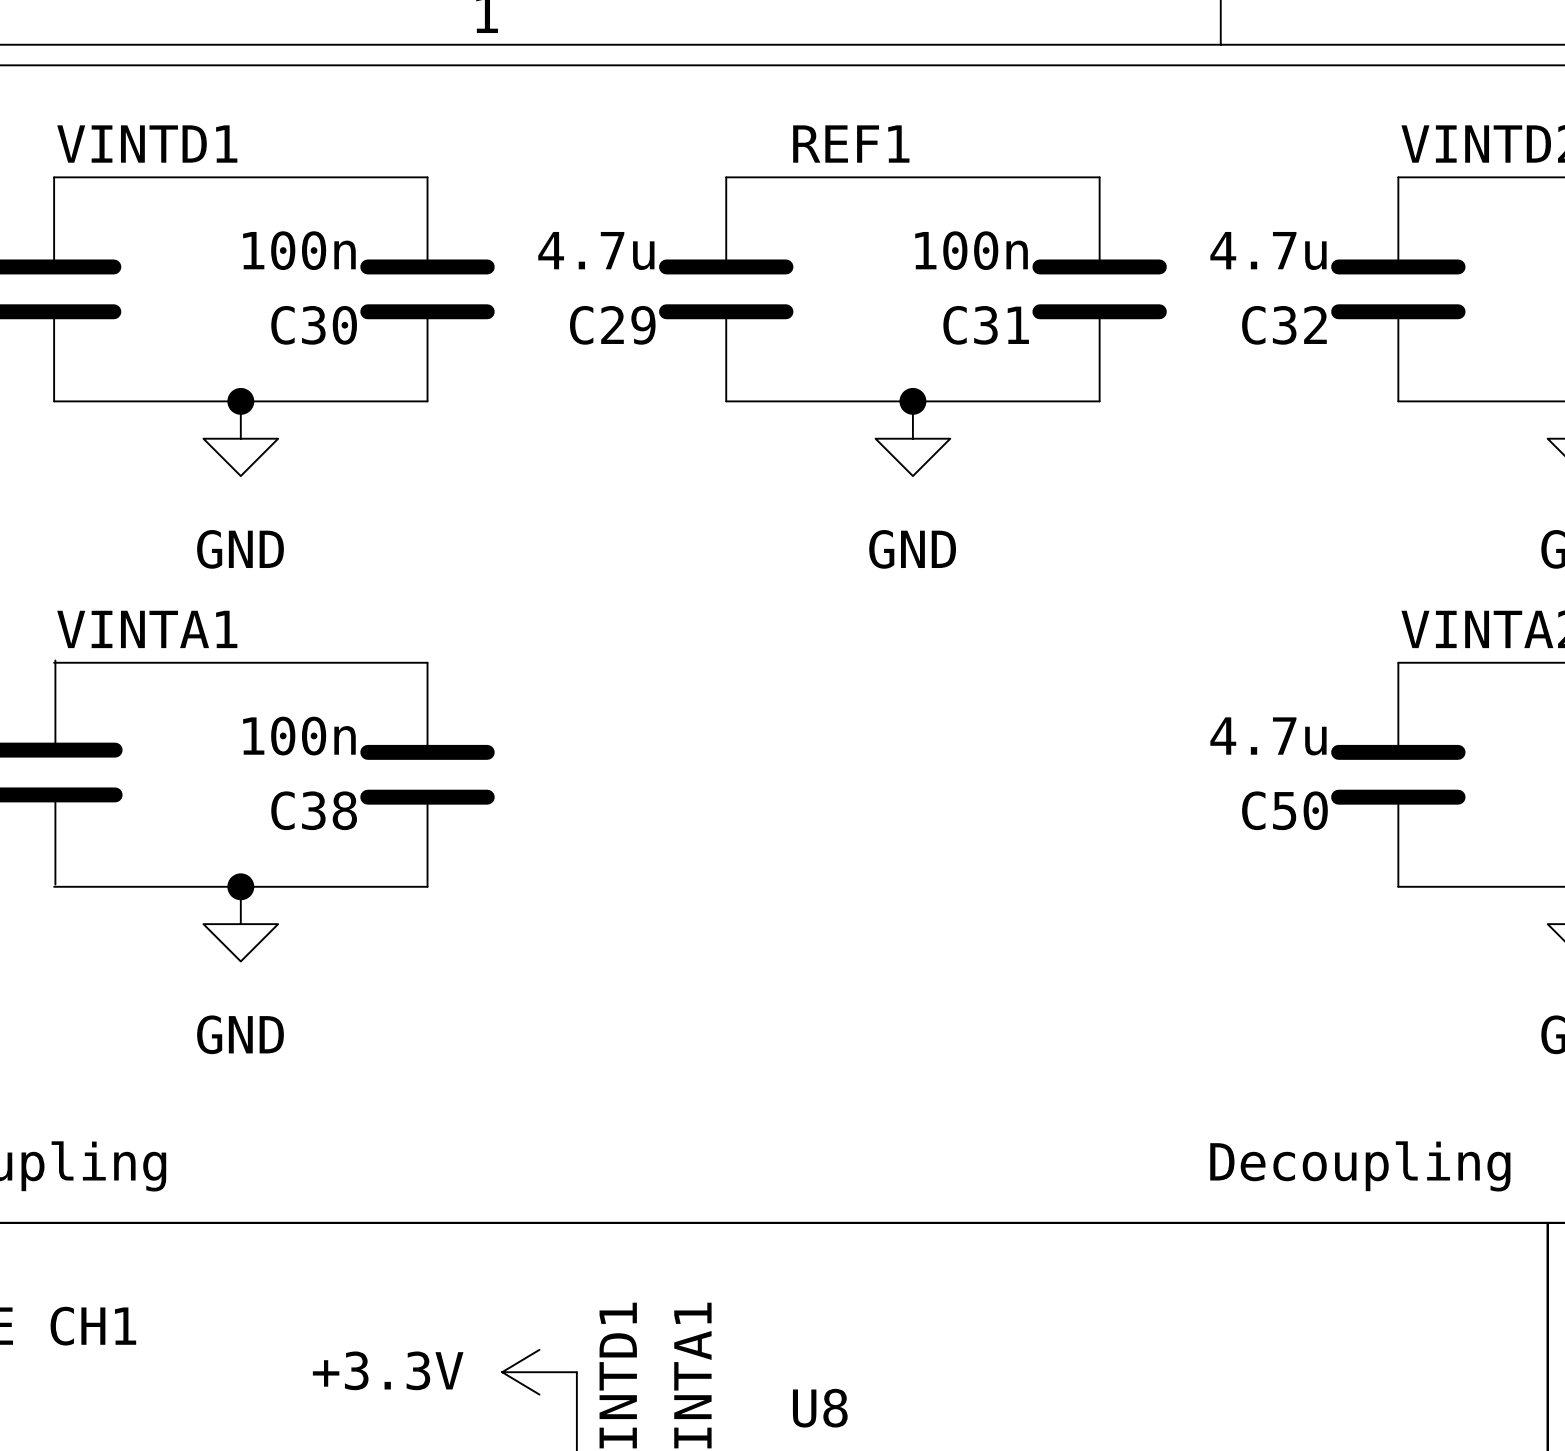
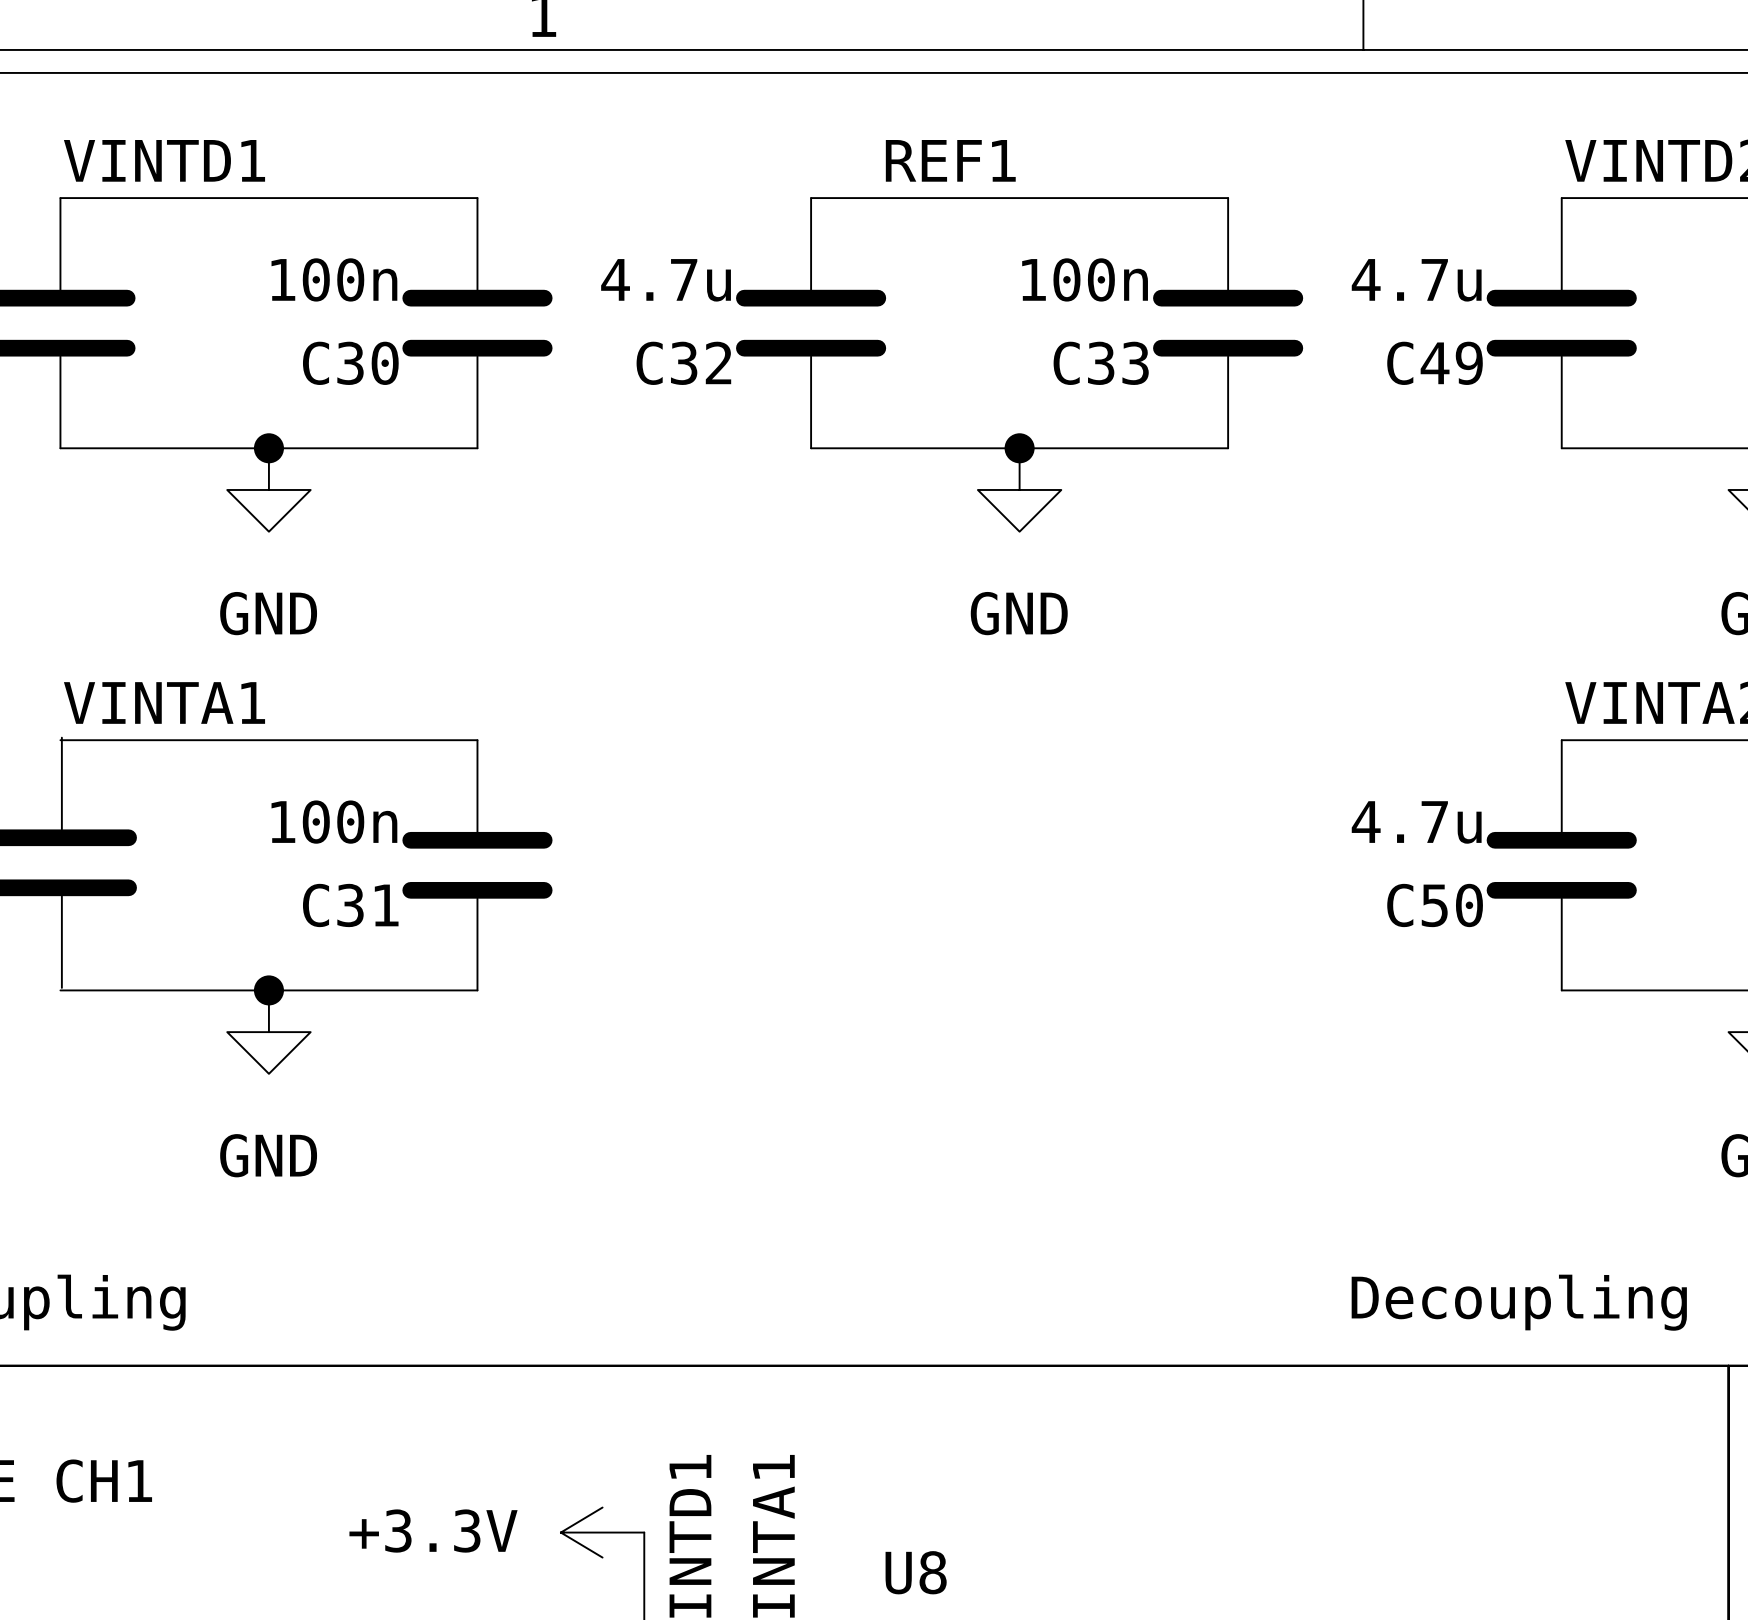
C29 name: C29 (612, 325) -> C32 (683, 363)
C31 name: C31 (986, 325) -> C33 (1101, 363)
C32 name: C32 (1284, 325) -> C49 (1435, 363)
C38 name: C38 (314, 810) -> C31 (350, 905)

